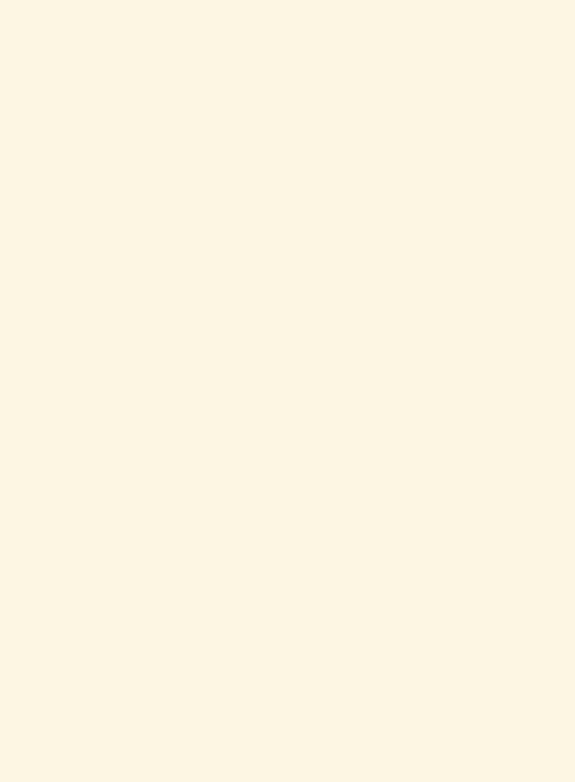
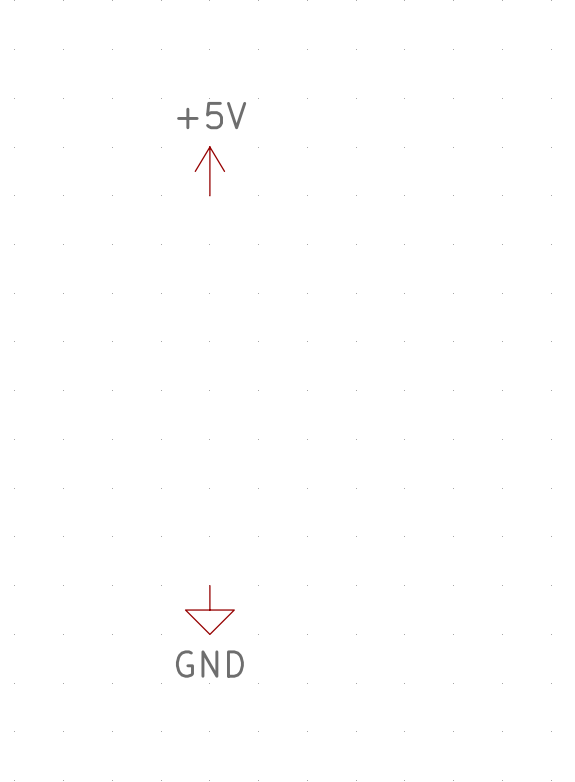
power symbol: none -> +5V (209, 171)
power symbol: none -> GND (209, 610)

